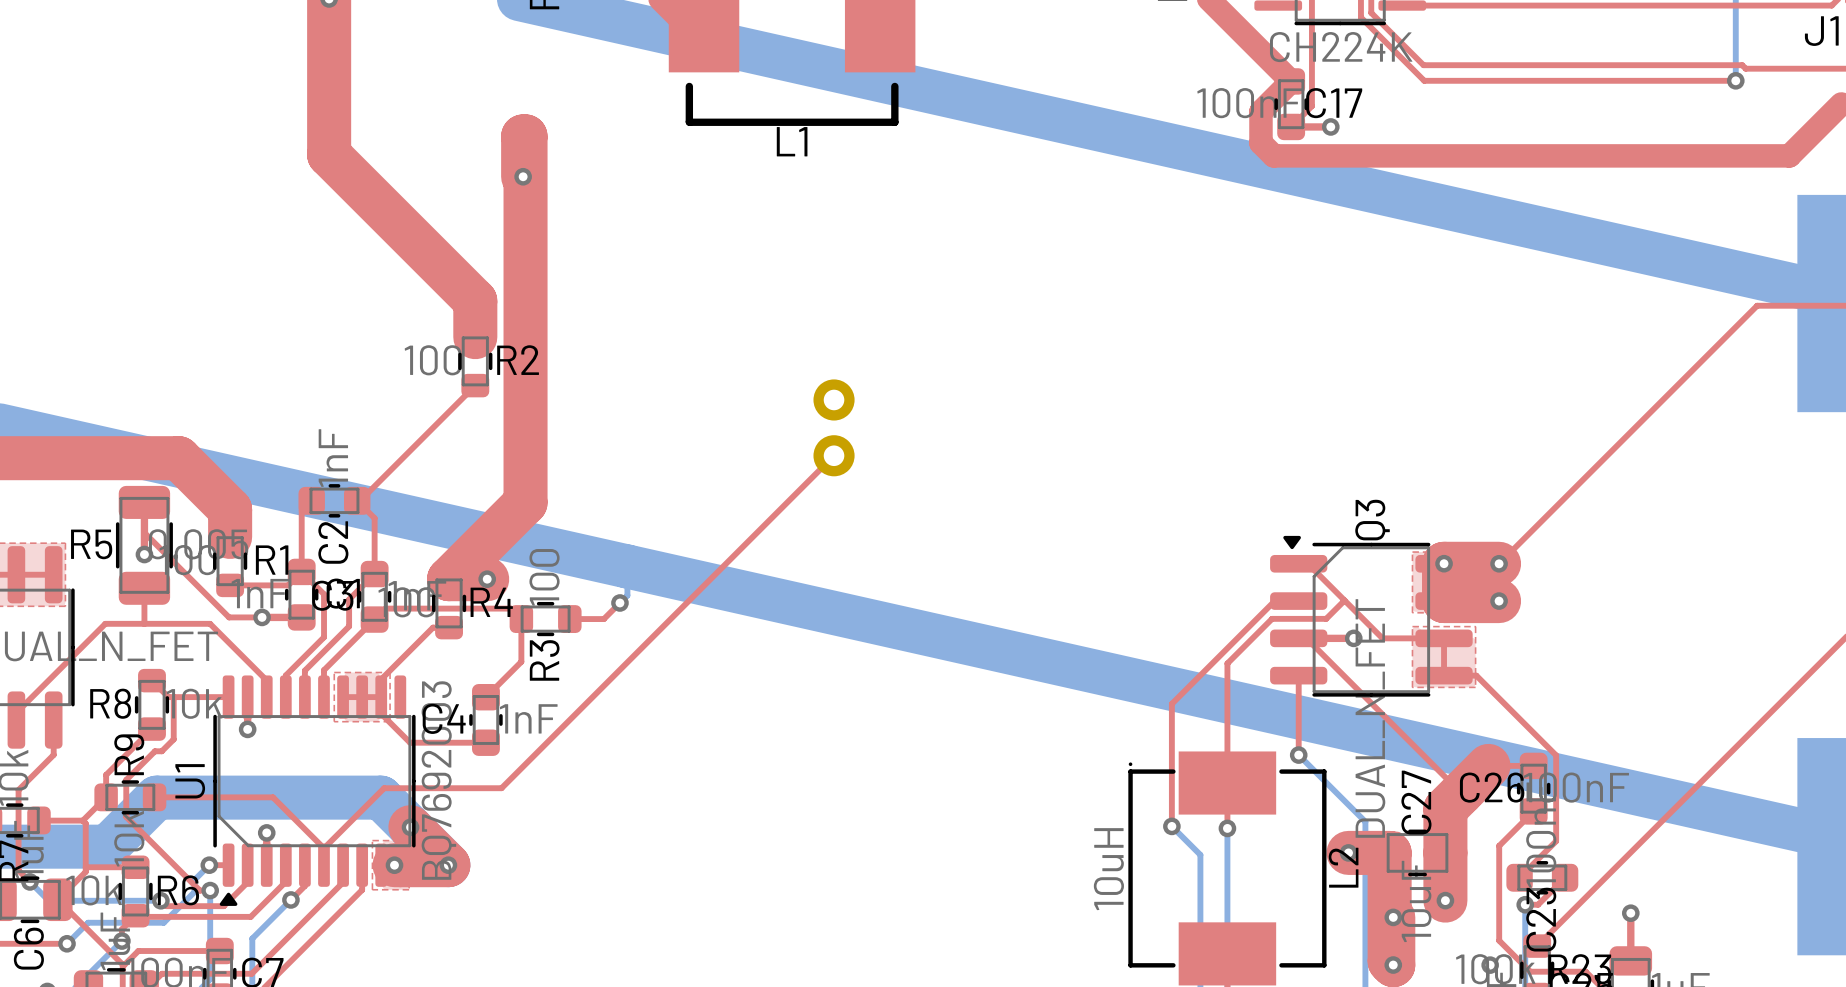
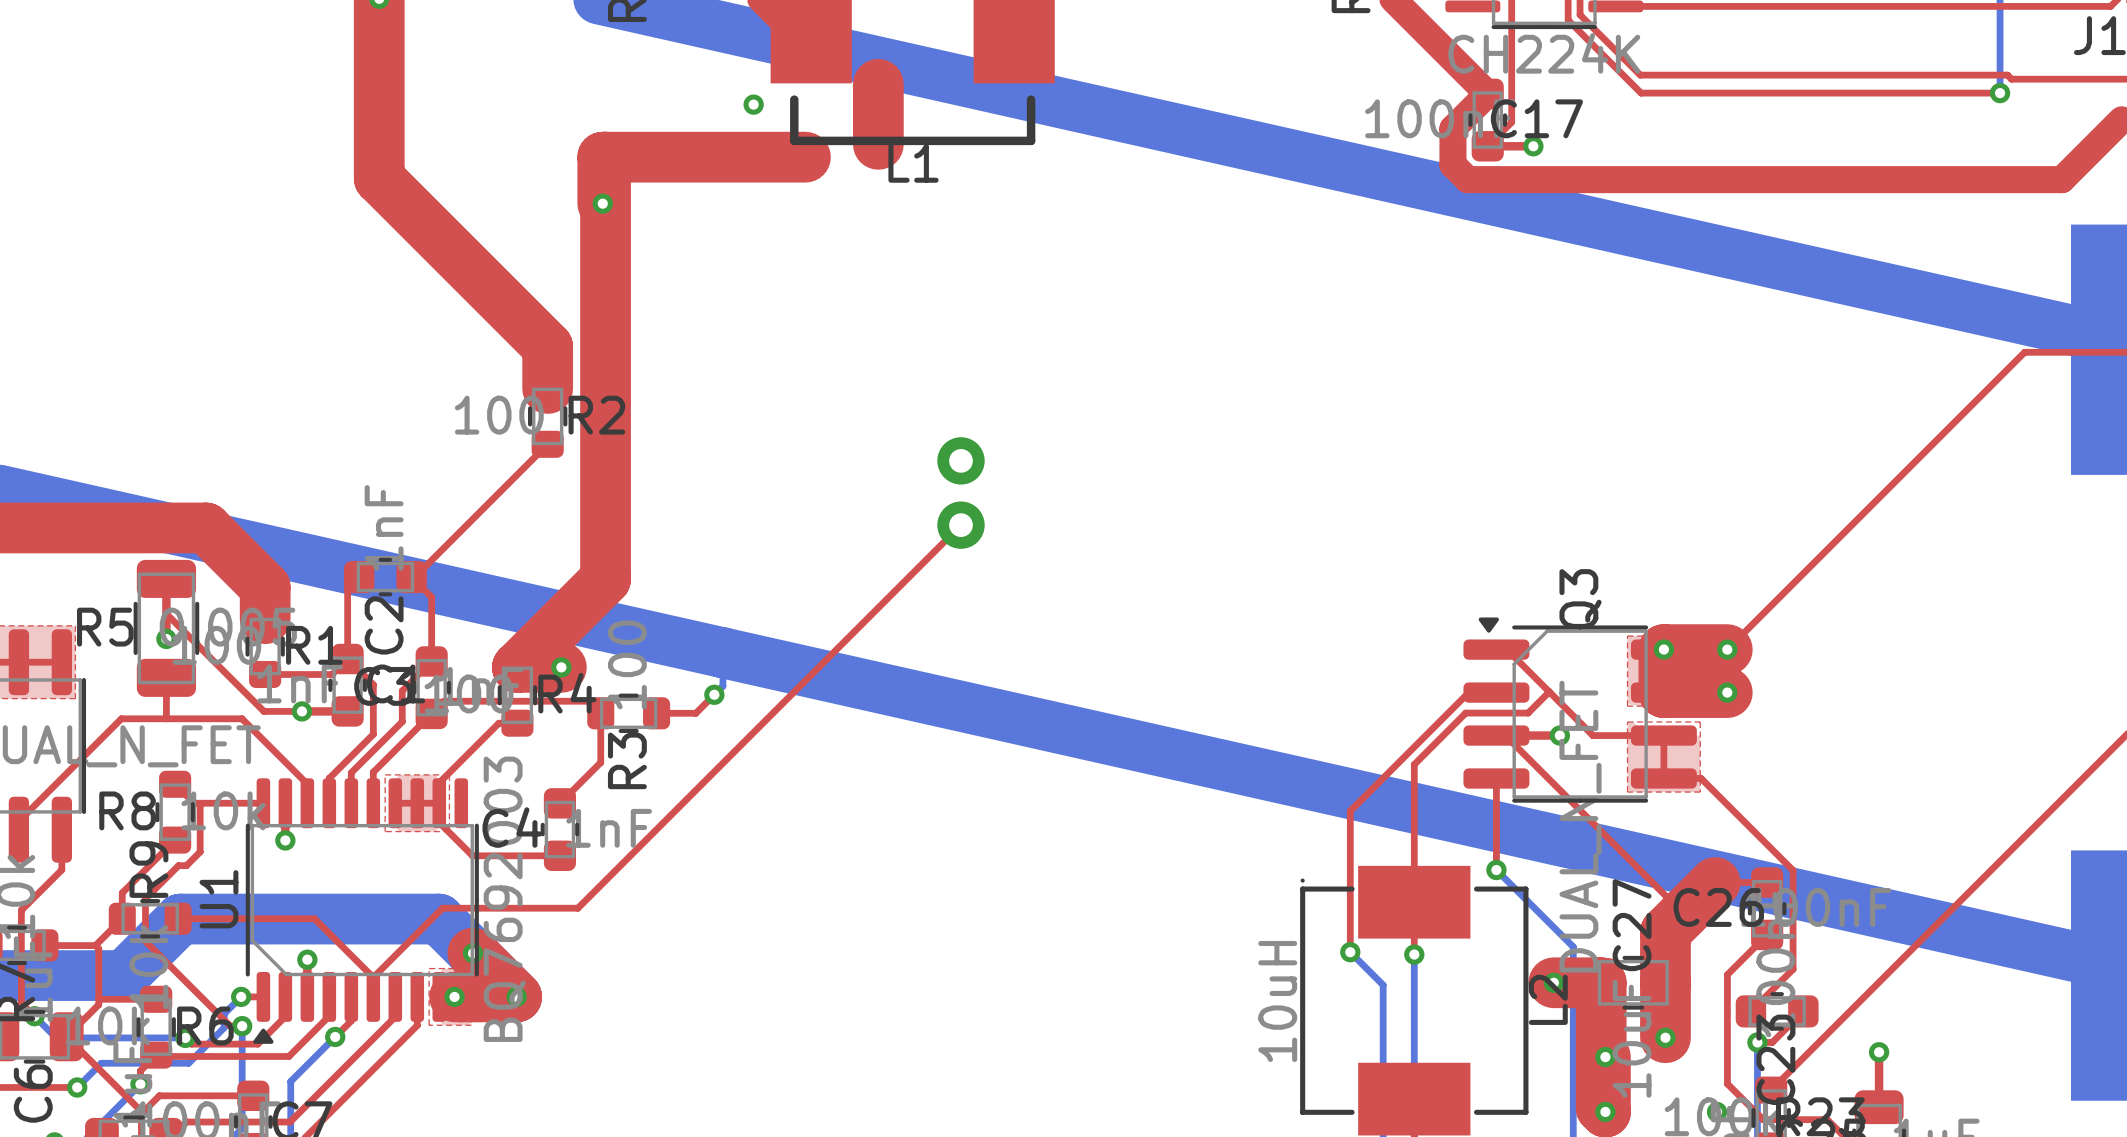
top track: none -> (878, 84) (878, 144)
via: none -> (753, 104)
top track: none -> (605, 157) (805, 157)

